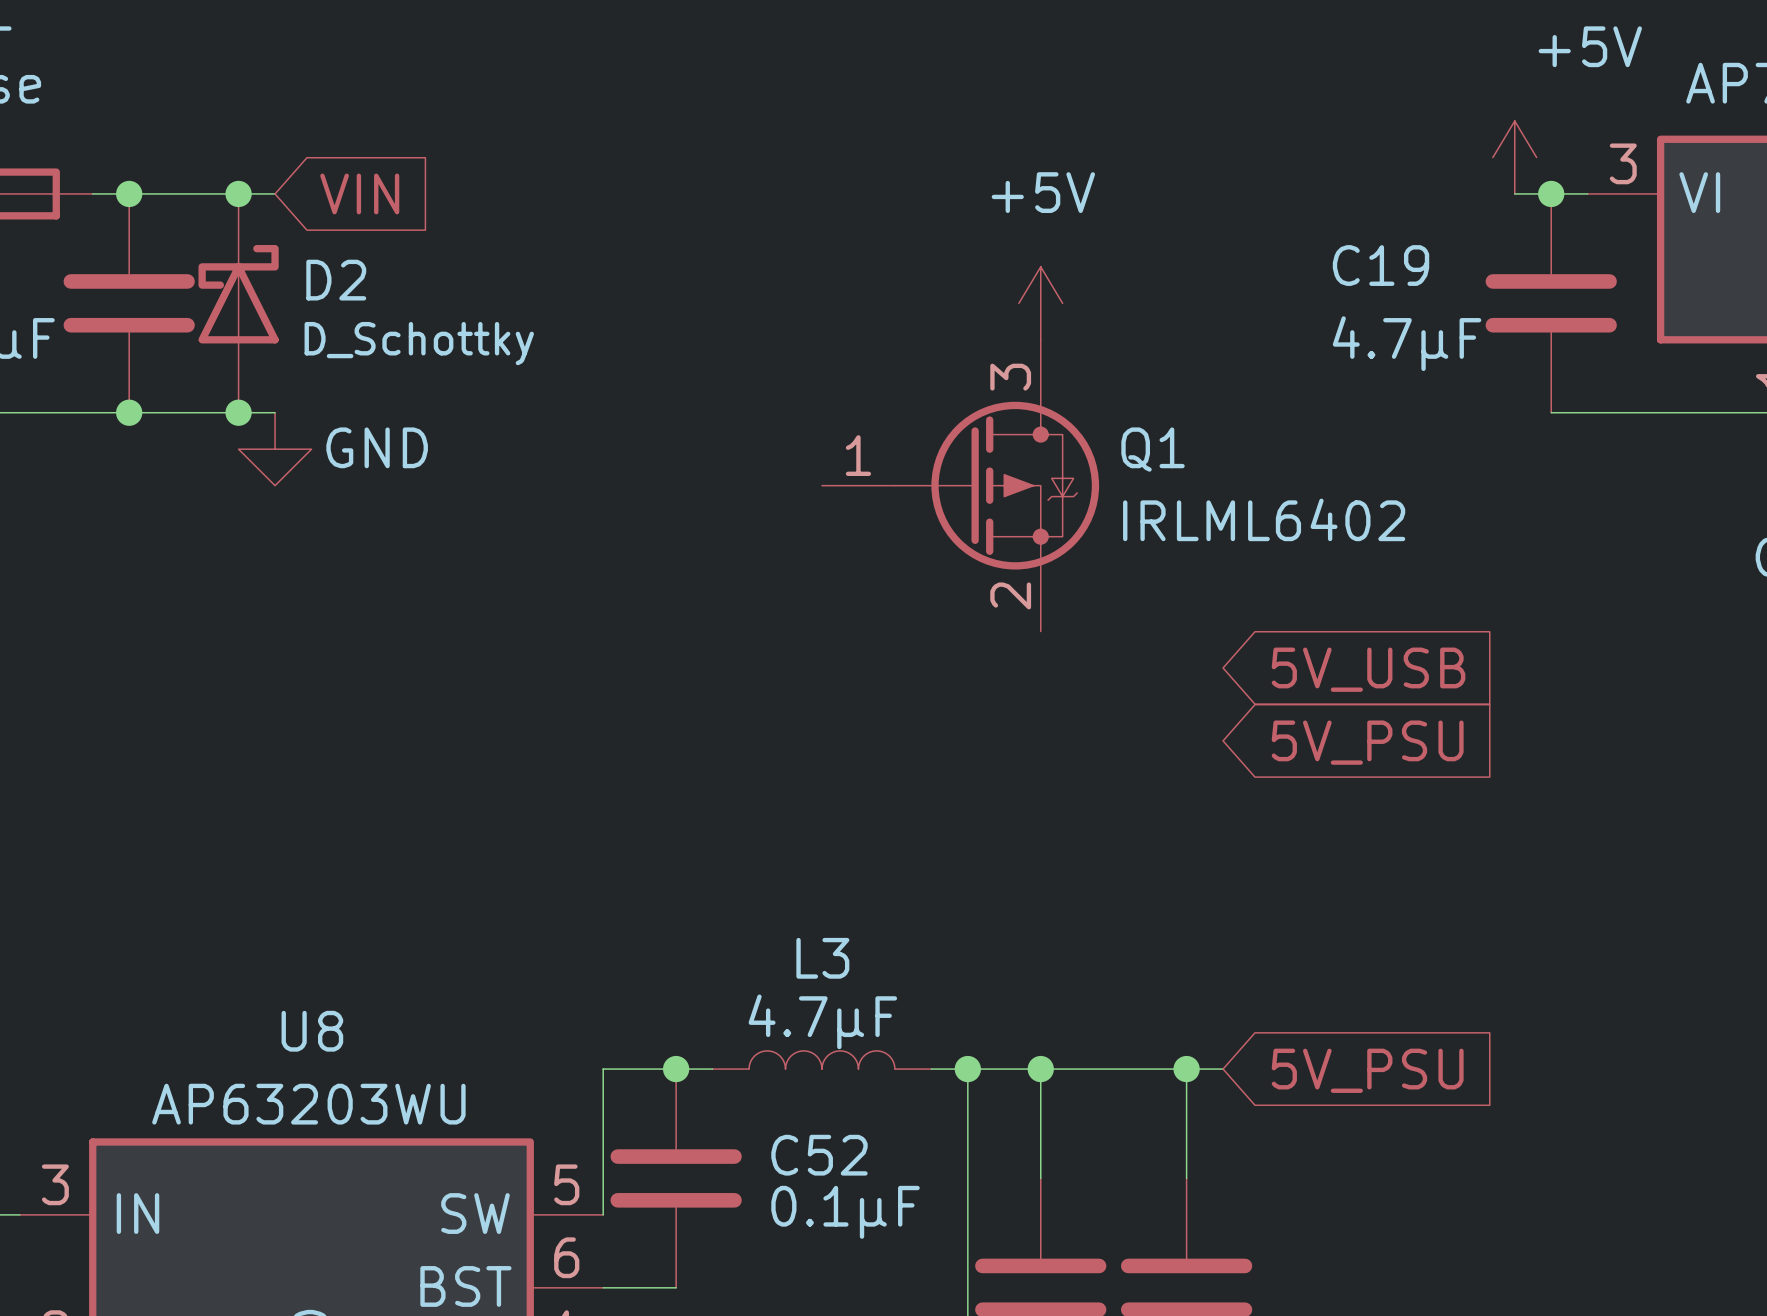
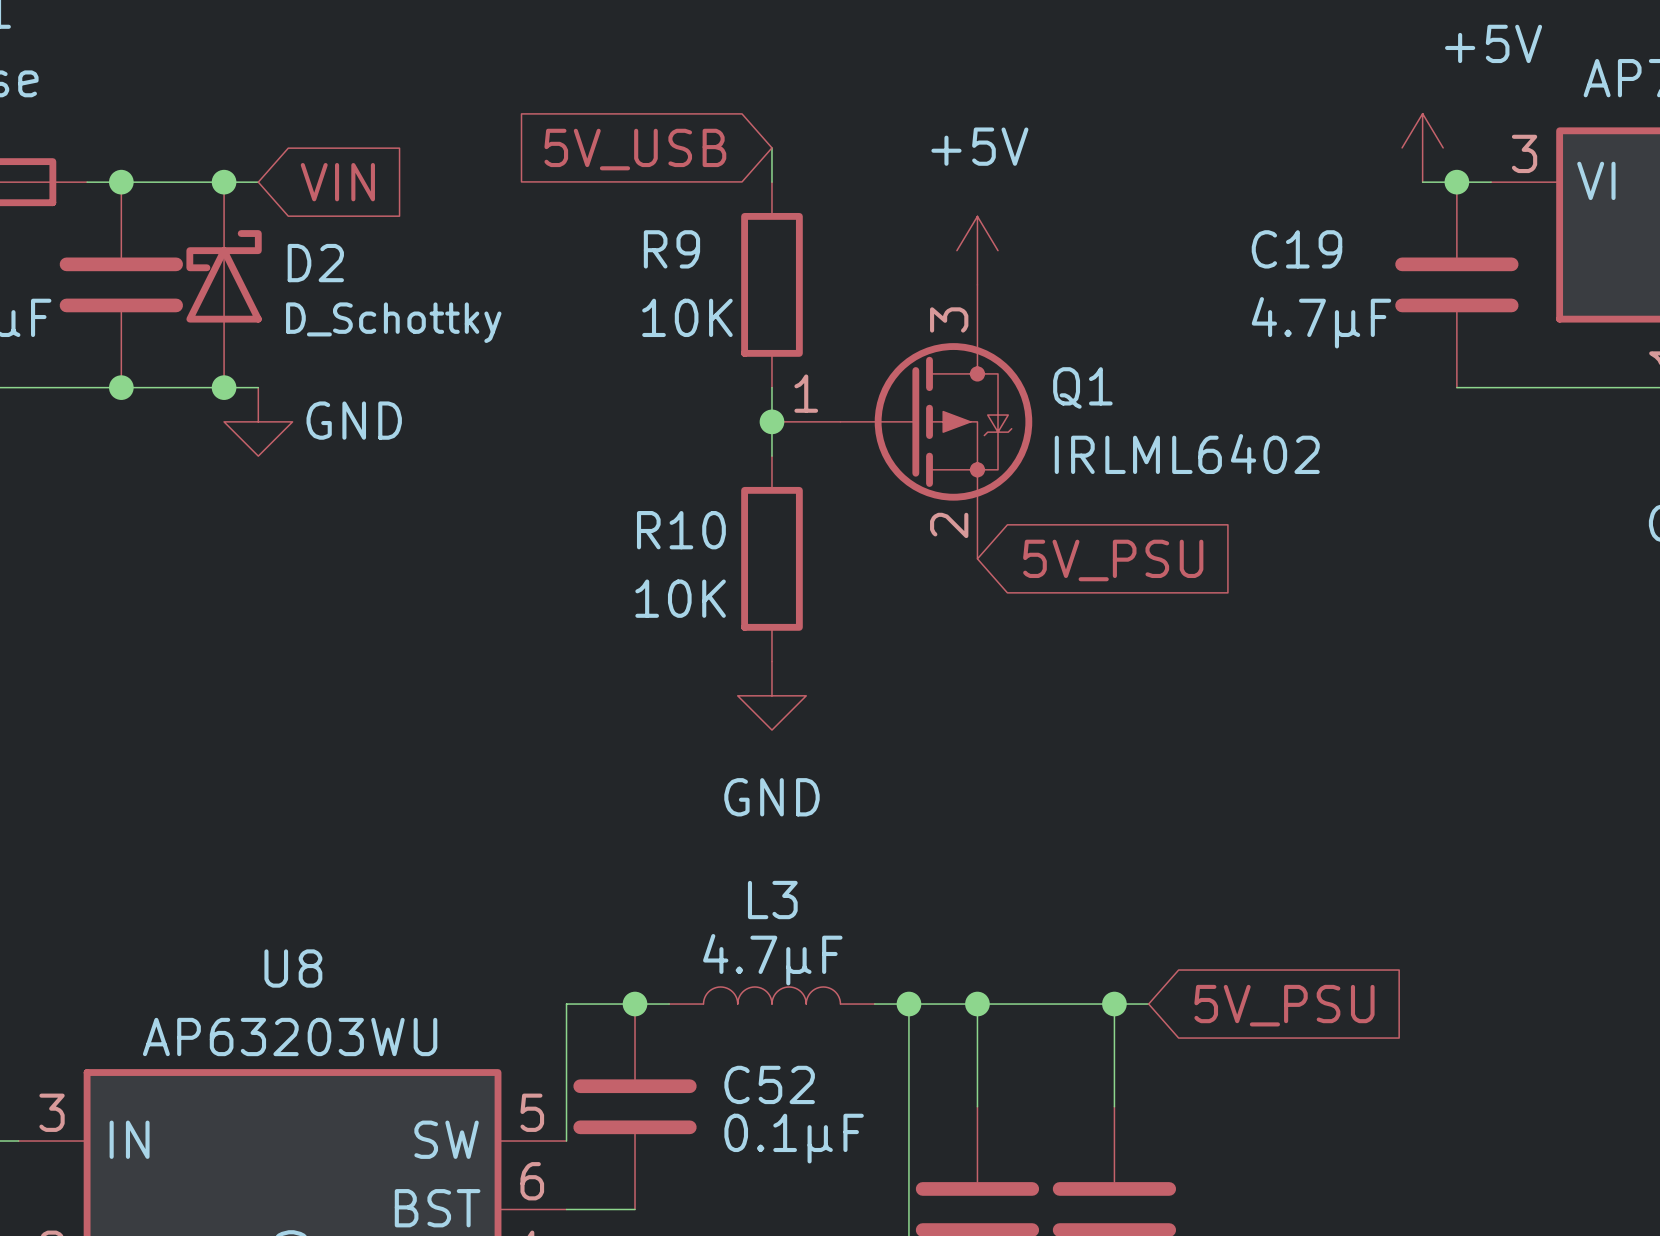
wire: none -> (771, 147) (771, 182)
R9: none -> 10K (771, 284)
power symbol position: +5V (1040, 303) -> +5V (977, 250)
wire: none -> (771, 387) (771, 456)
junction: none -> (771, 421)
Q1 position: (960, 485) -> (902, 421)
R10: none -> 10K (771, 558)
global label rotation: 0° (1368, 669) -> 180° (635, 149)
global label position: 5V_USB (1368, 669) -> 5V_USB (635, 149)
power symbol: none -> GND (771, 695)
global label position: 5V_PSU (1367, 742) -> 5V_PSU (1113, 560)

